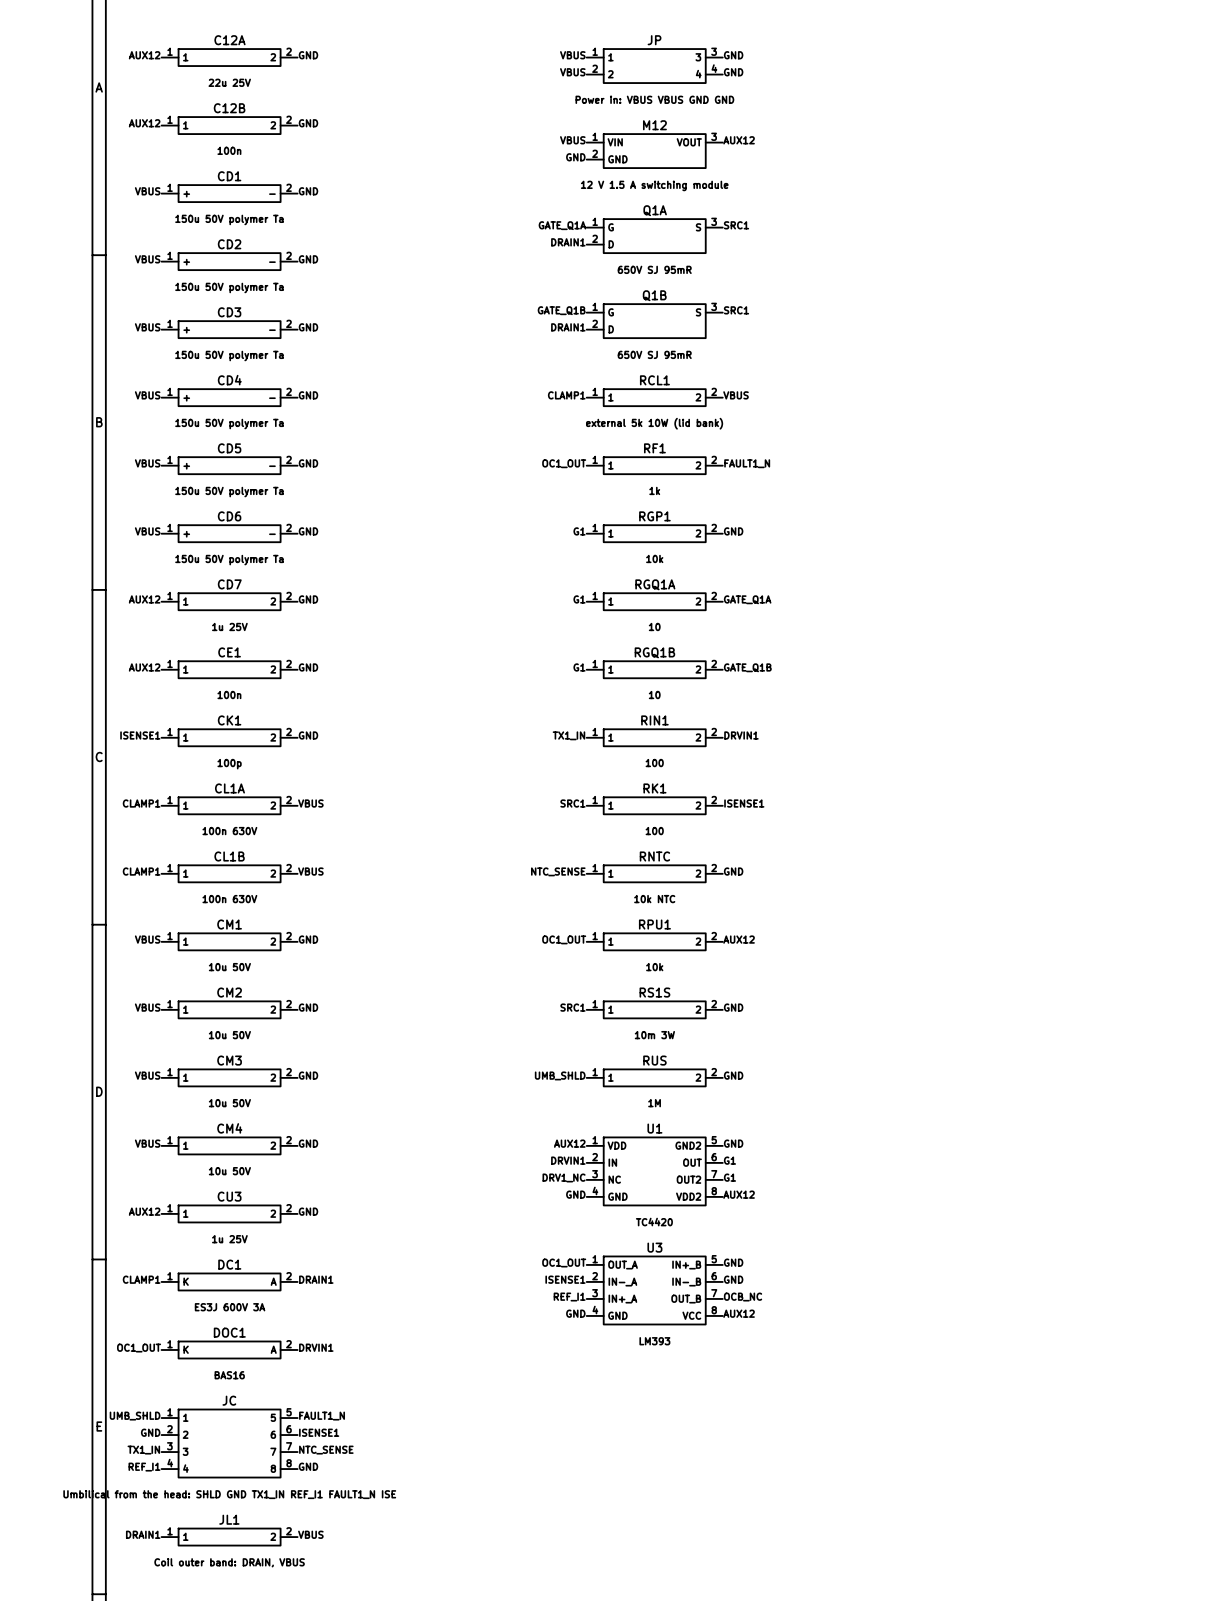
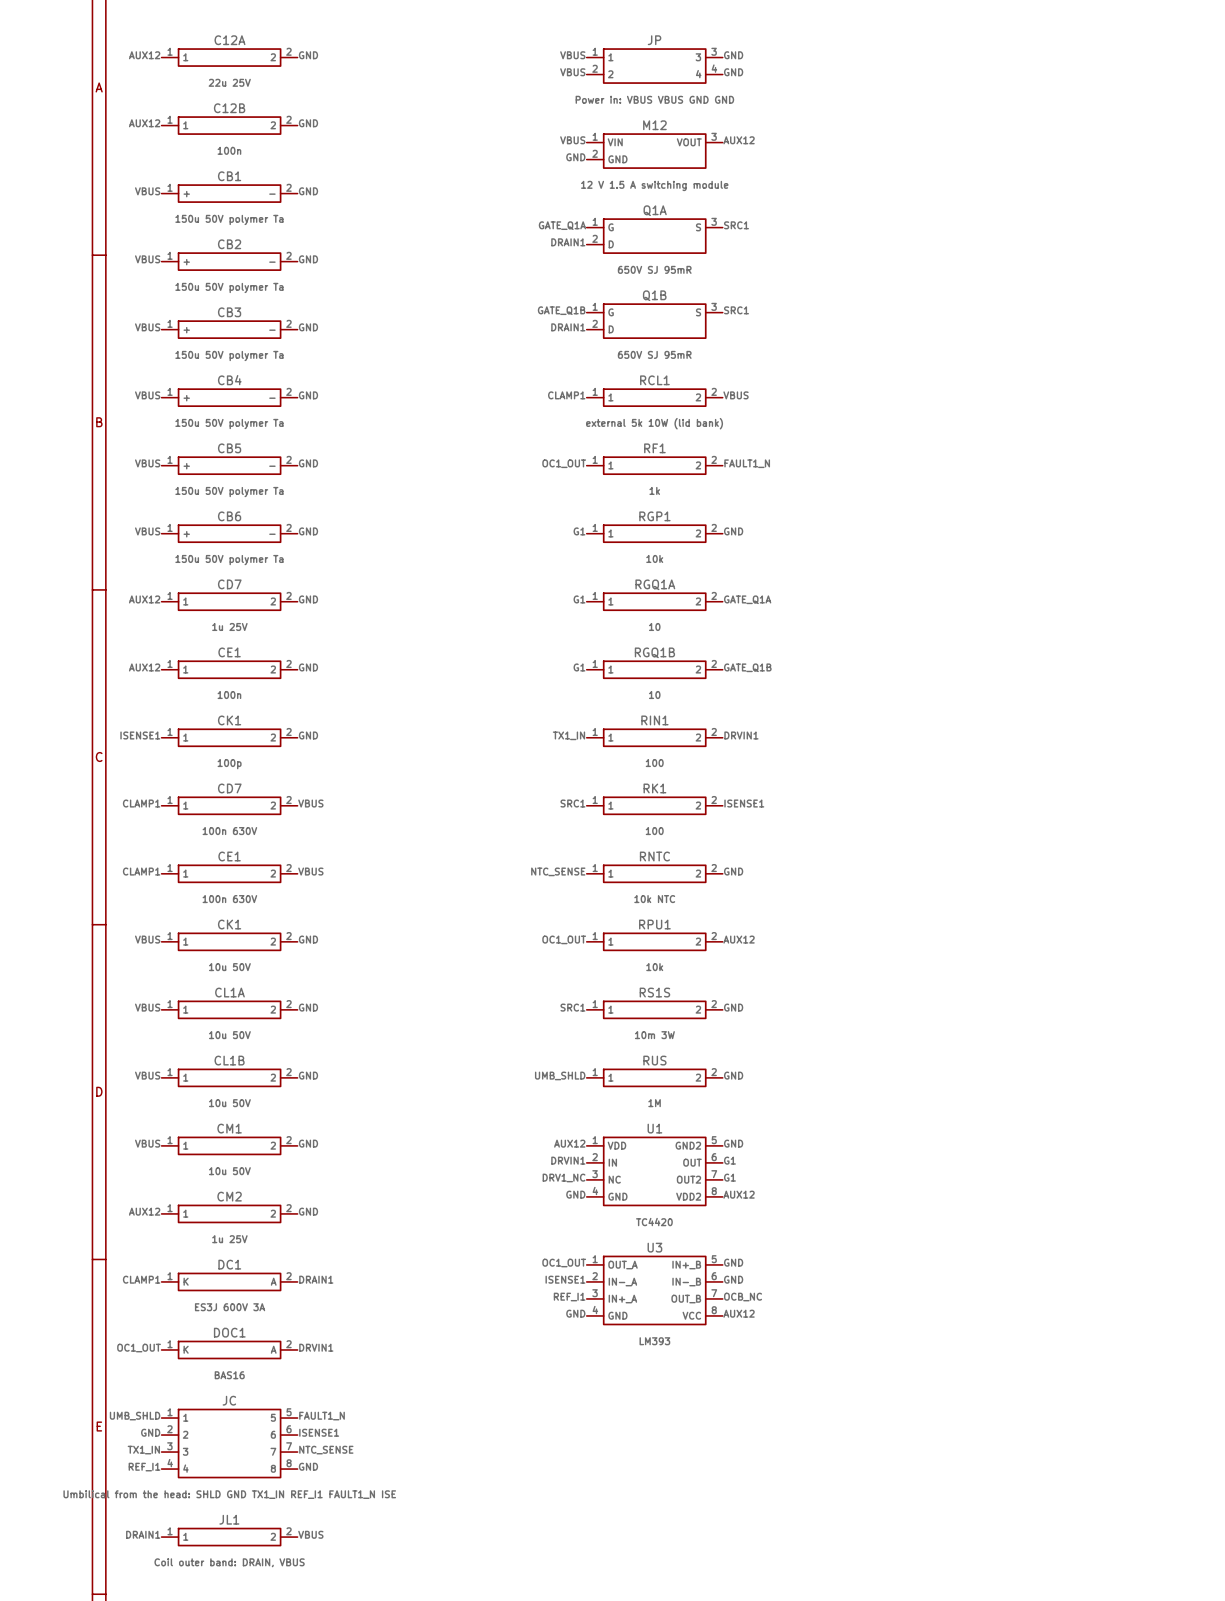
CD1 name: CD1 (229, 176) -> CB1 (229, 176)
CD2 name: CD2 (229, 244) -> CB2 (229, 244)
CD3 name: CD3 (229, 312) -> CB3 (229, 312)
CD4 name: CD4 (229, 380) -> CB4 (229, 380)
CD5 name: CD5 (229, 448) -> CB5 (229, 448)
CD6 name: CD6 (229, 516) -> CB6 (229, 516)
CL1A name: CL1A (229, 788) -> CD7 (229, 788)
CL1B name: CL1B (229, 856) -> CE1 (229, 856)
CM1 name: CM1 (229, 924) -> CK1 (229, 924)
CM2 name: CM2 (229, 992) -> CL1A (229, 992)
CM3 name: CM3 (229, 1060) -> CL1B (229, 1060)
CM4 name: CM4 (229, 1128) -> CM1 (229, 1128)
CU3 name: CU3 (229, 1196) -> CM2 (229, 1196)

